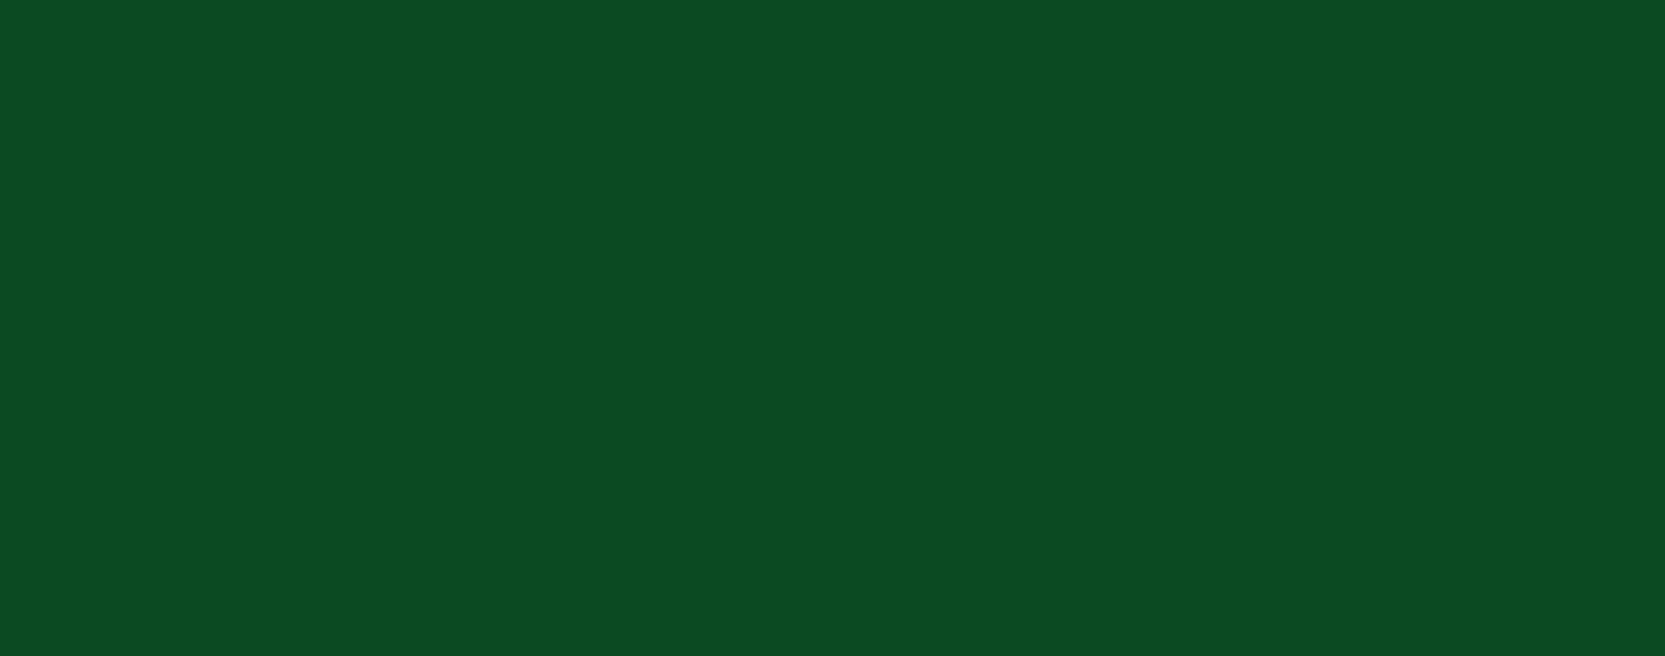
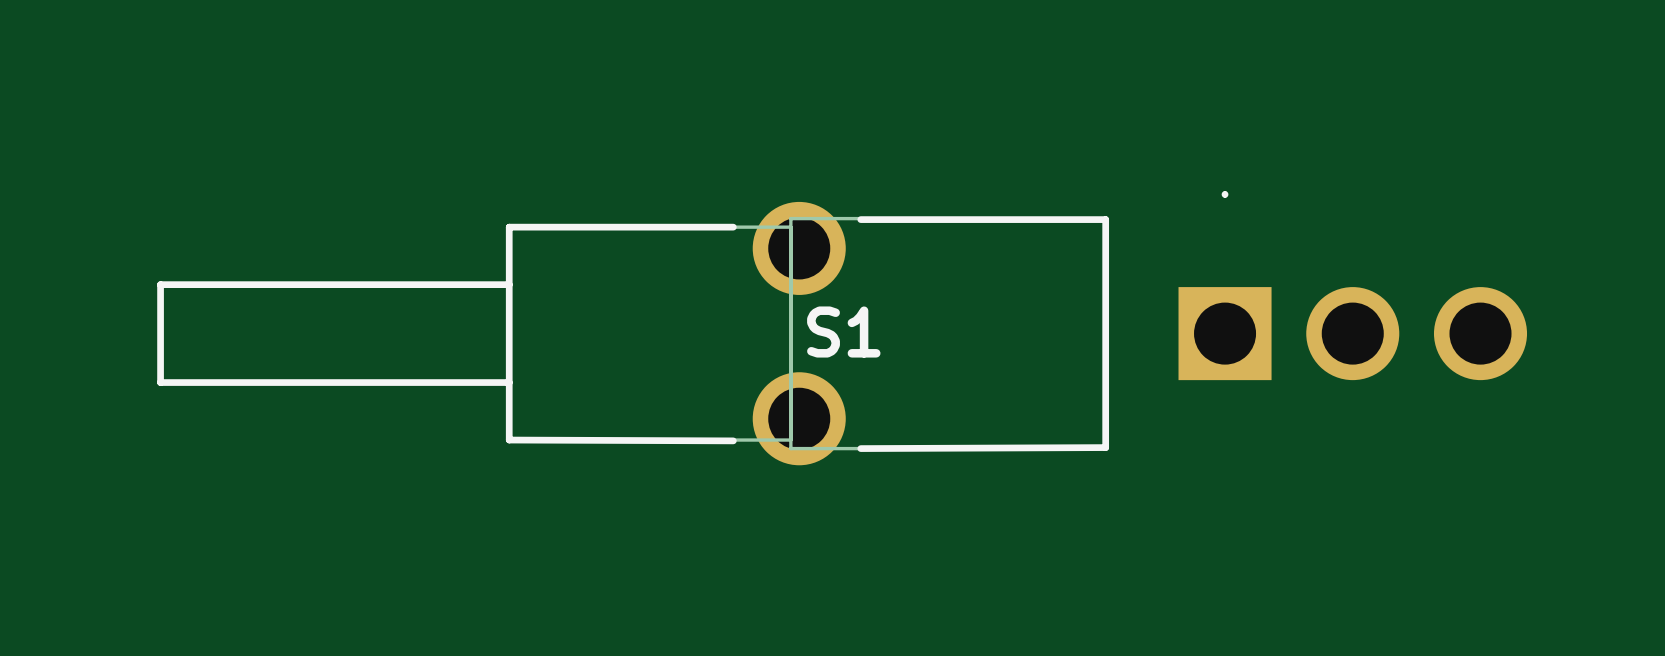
S1: none -> (842, 328)

